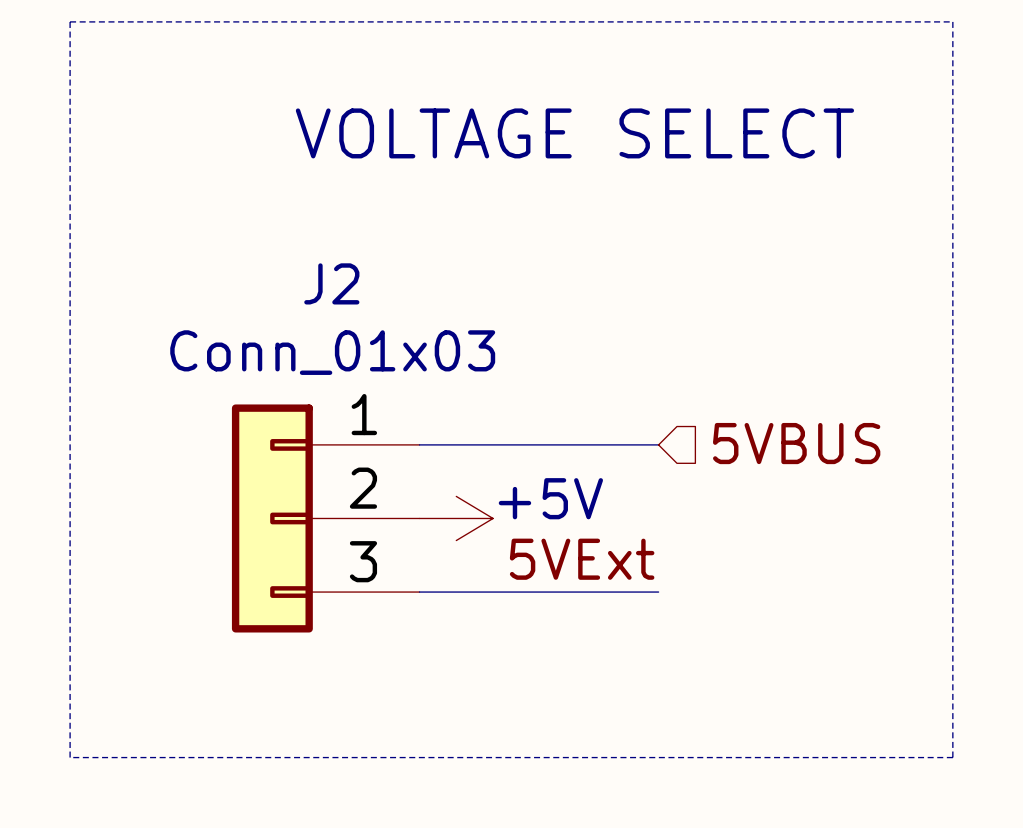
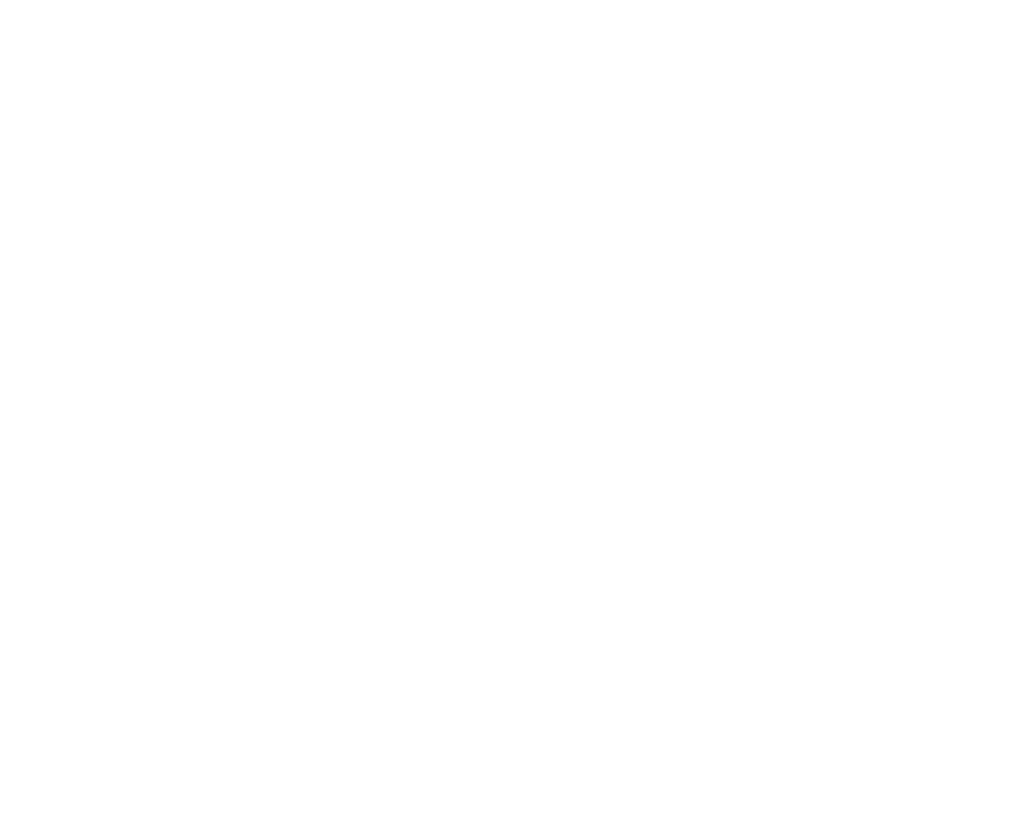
line: (70, 21) (952, 21) (952, 757) (70, 757) (70, 21) -> none
text: VOLTAGE SELECT (574, 133) -> none
hierarchical label: 5VBUS (796, 443) -> none
wire: (419, 444) (658, 444) -> none
J2: Conn_01x03 (325, 518) -> none
power symbol: +5V (456, 518) -> none
label: 5VExt (582, 559) -> none
wire: (419, 592) (658, 592) -> none

